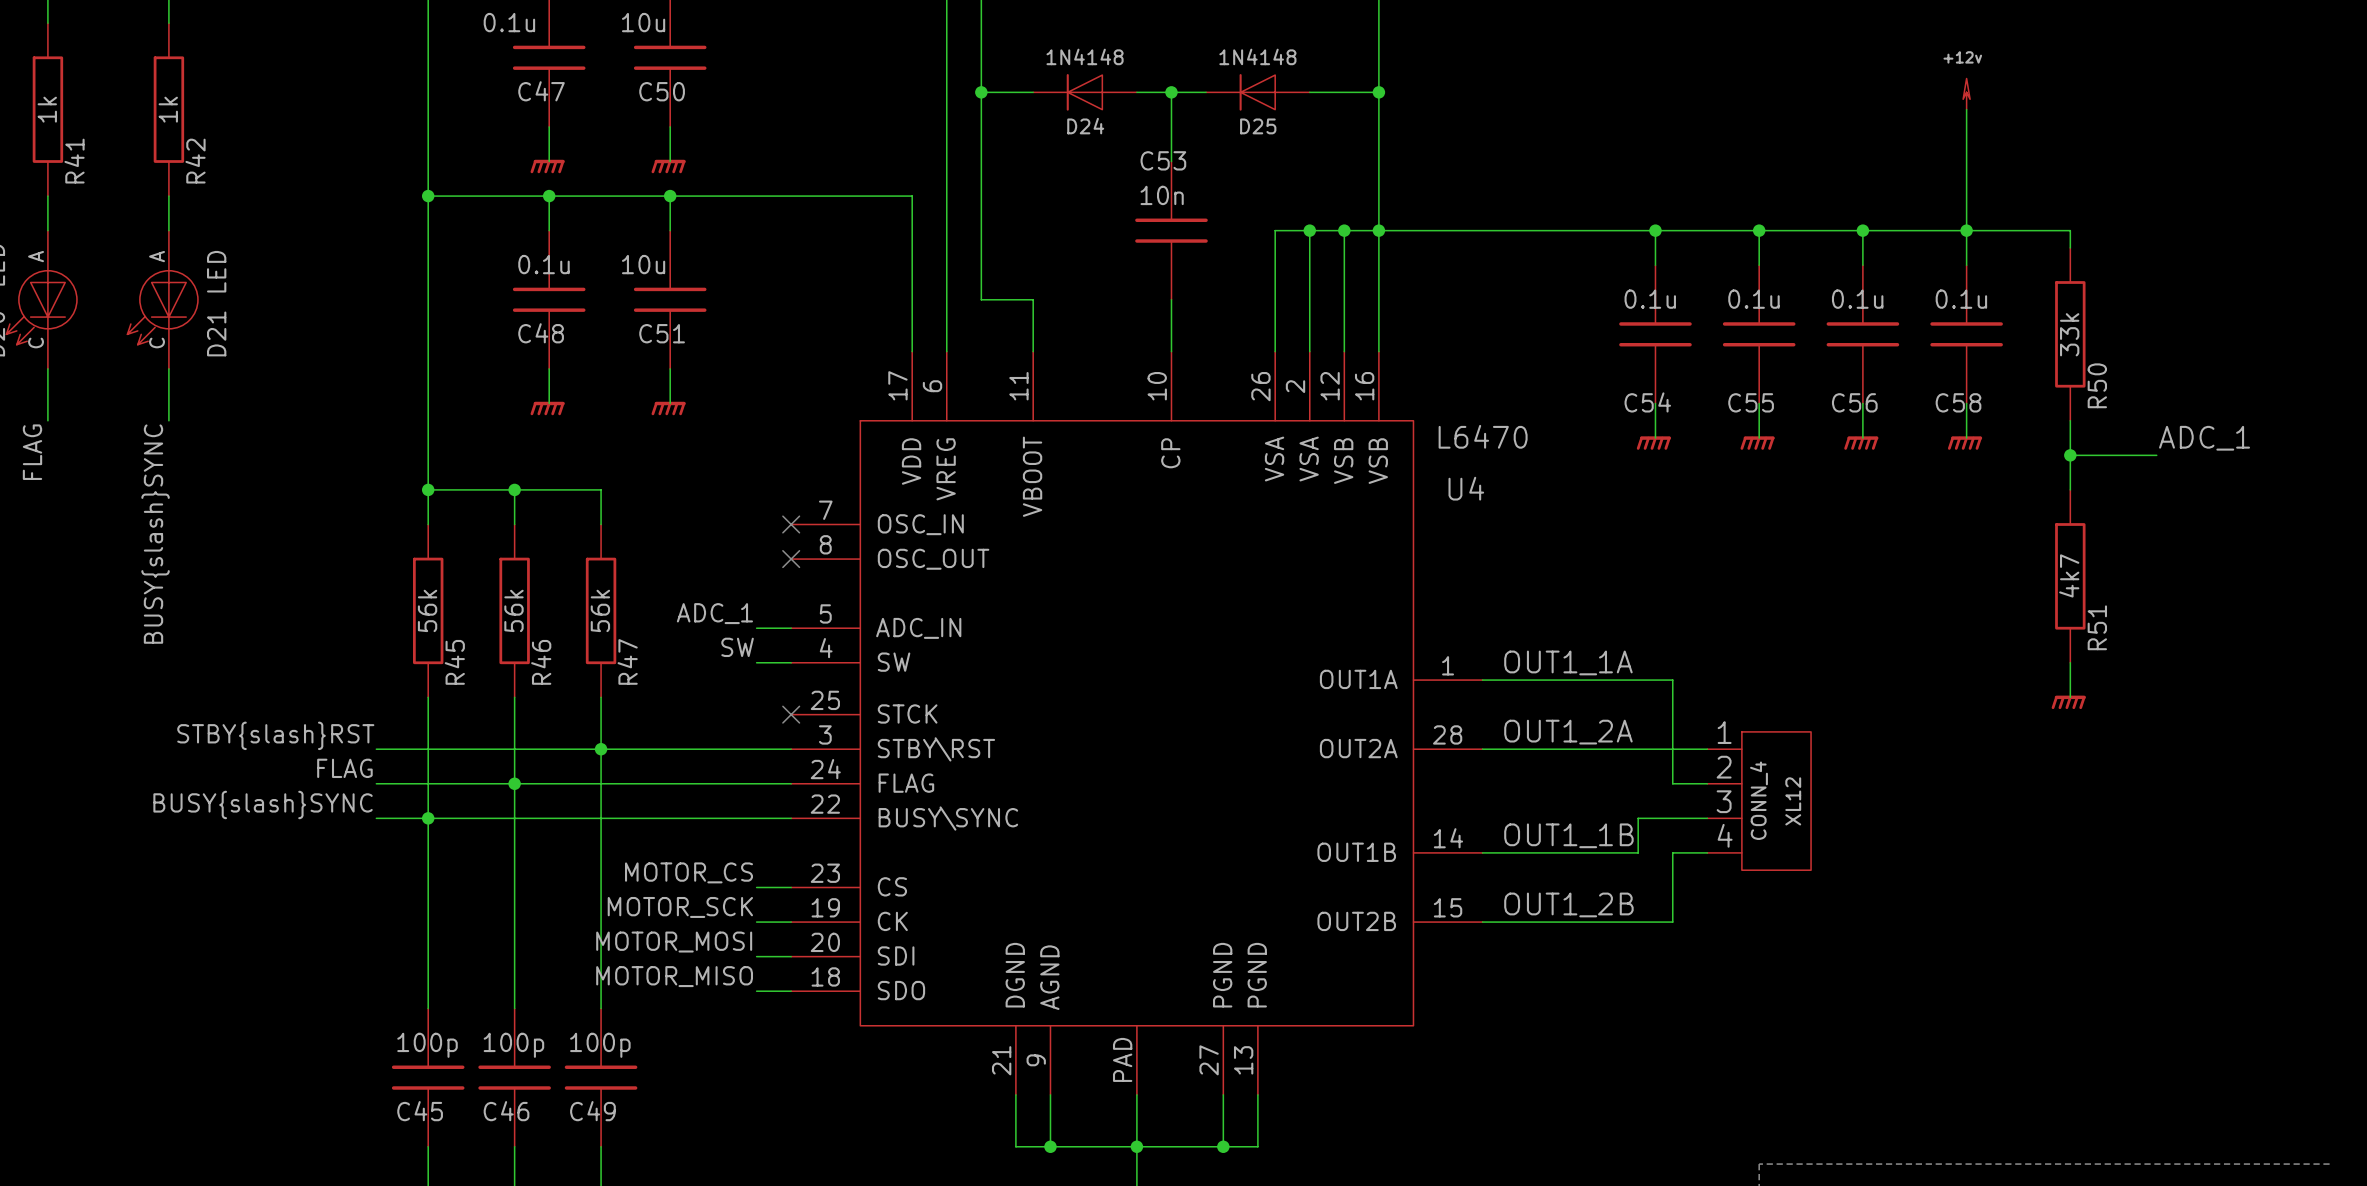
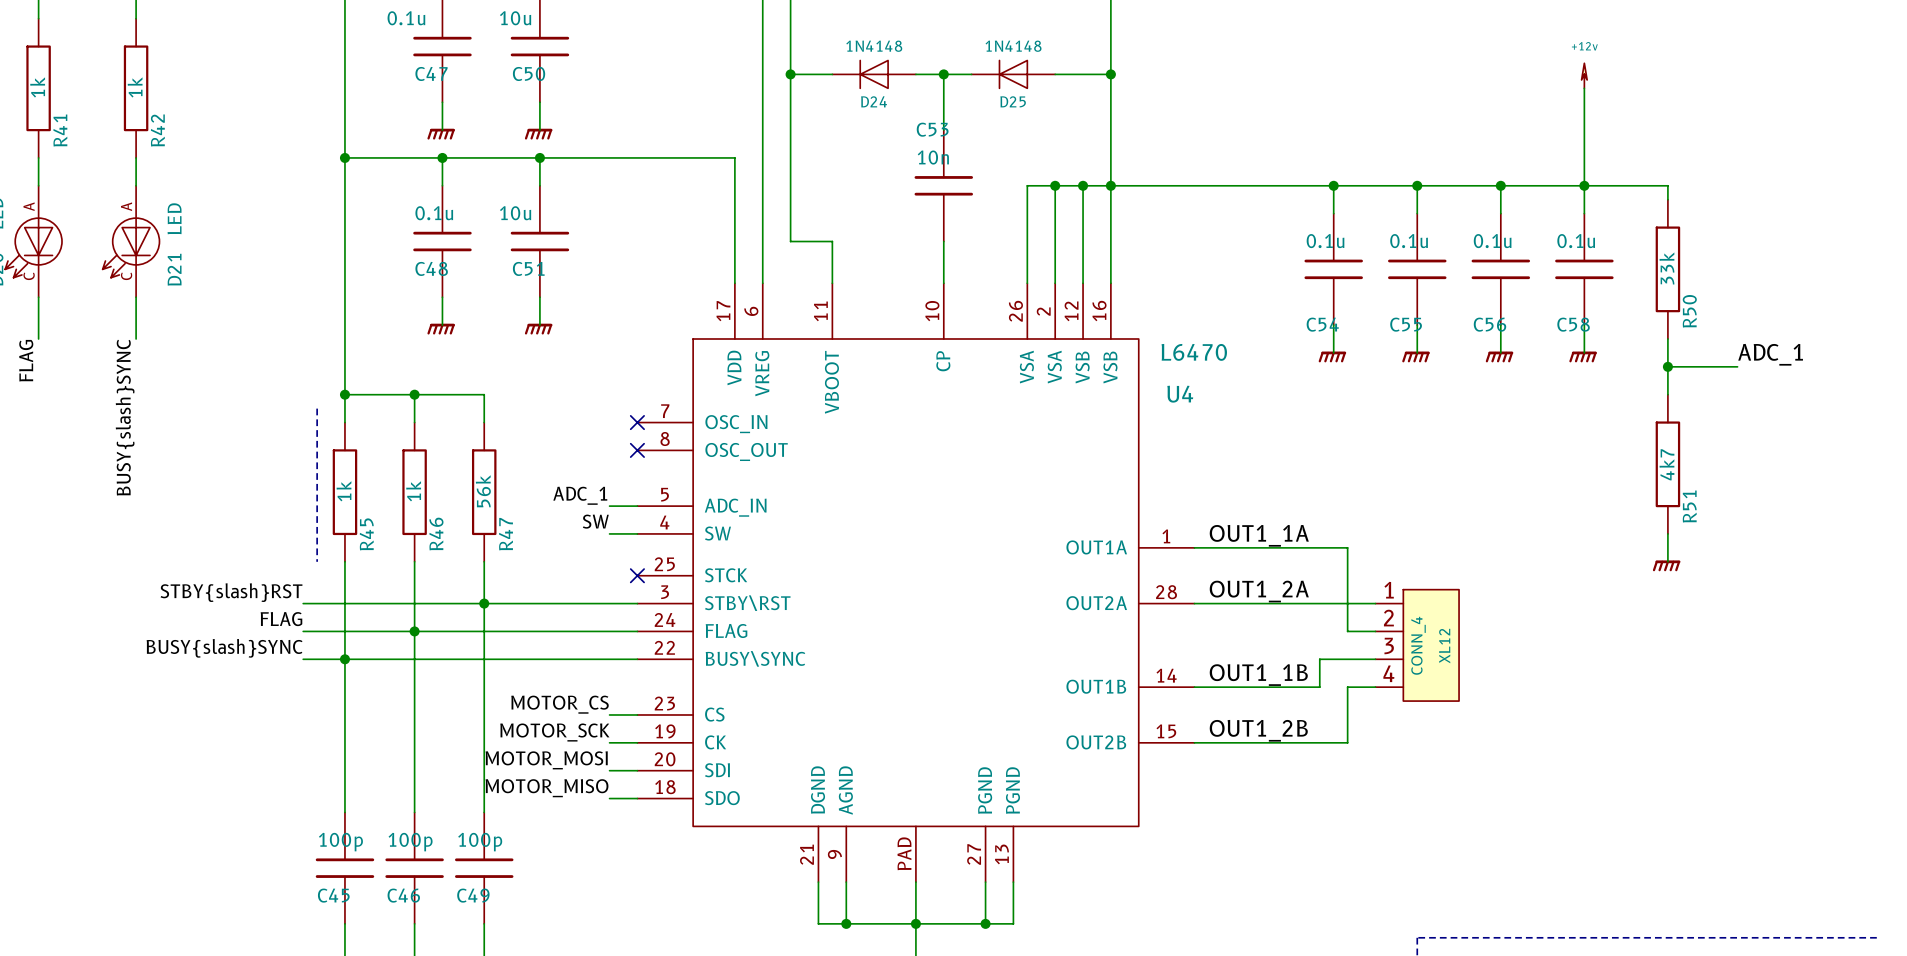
line: none -> (317, 408) (317, 561)
R45 value: 56k (427, 610) -> 1k (343, 491)
R46 value: 56k (513, 610) -> 1k (413, 491)

